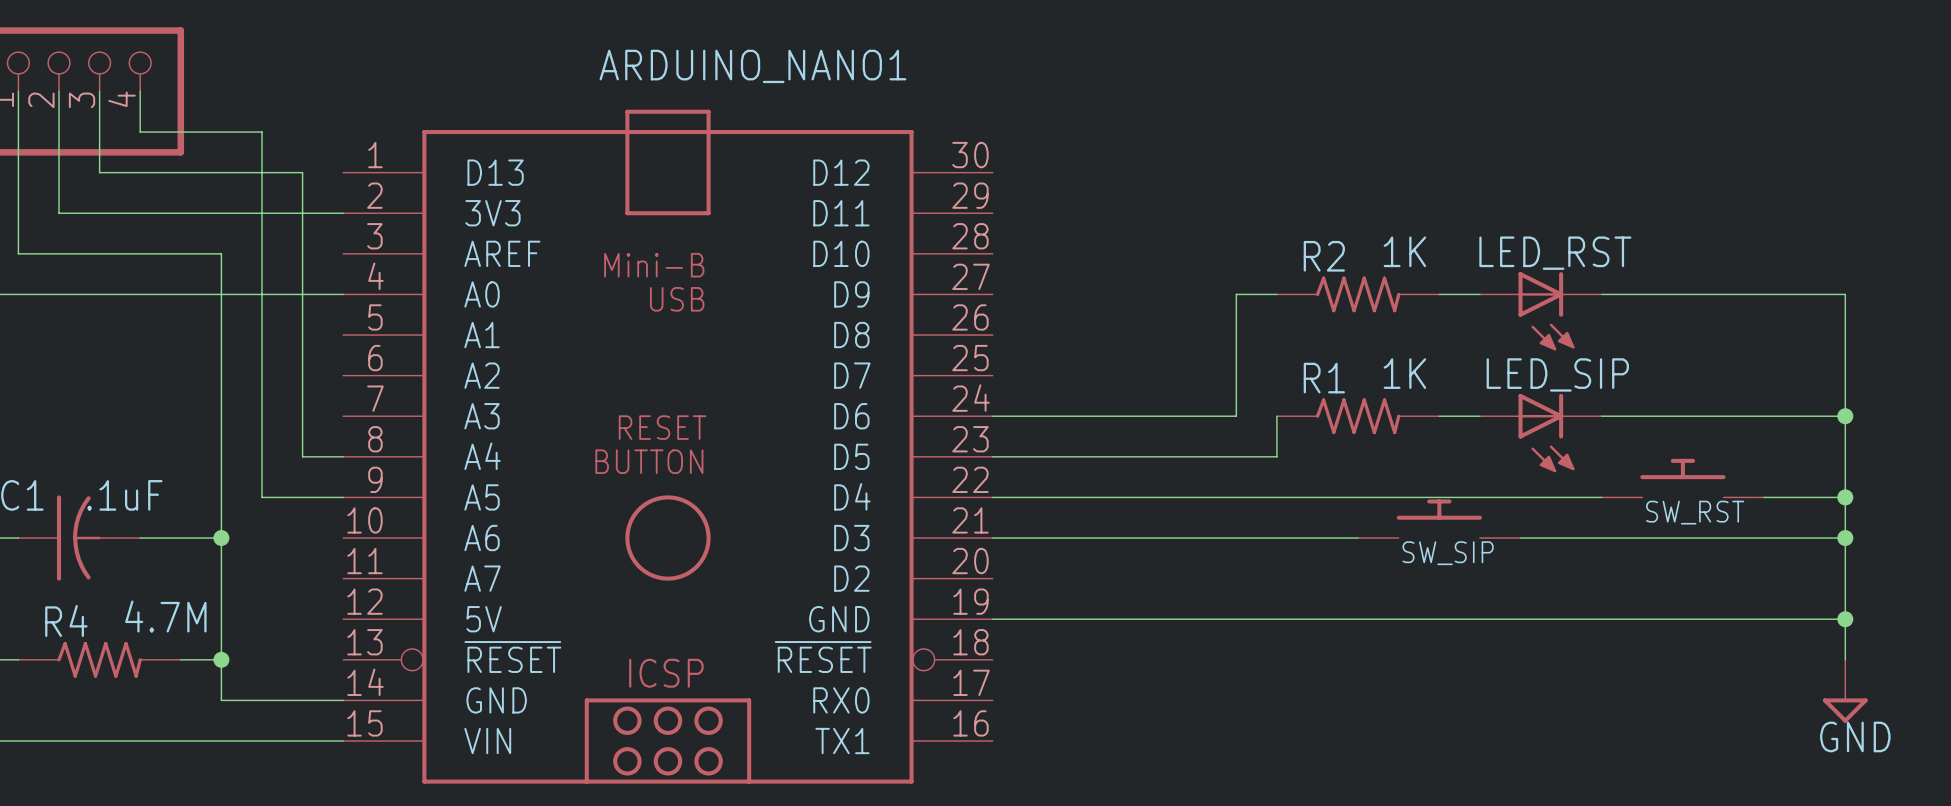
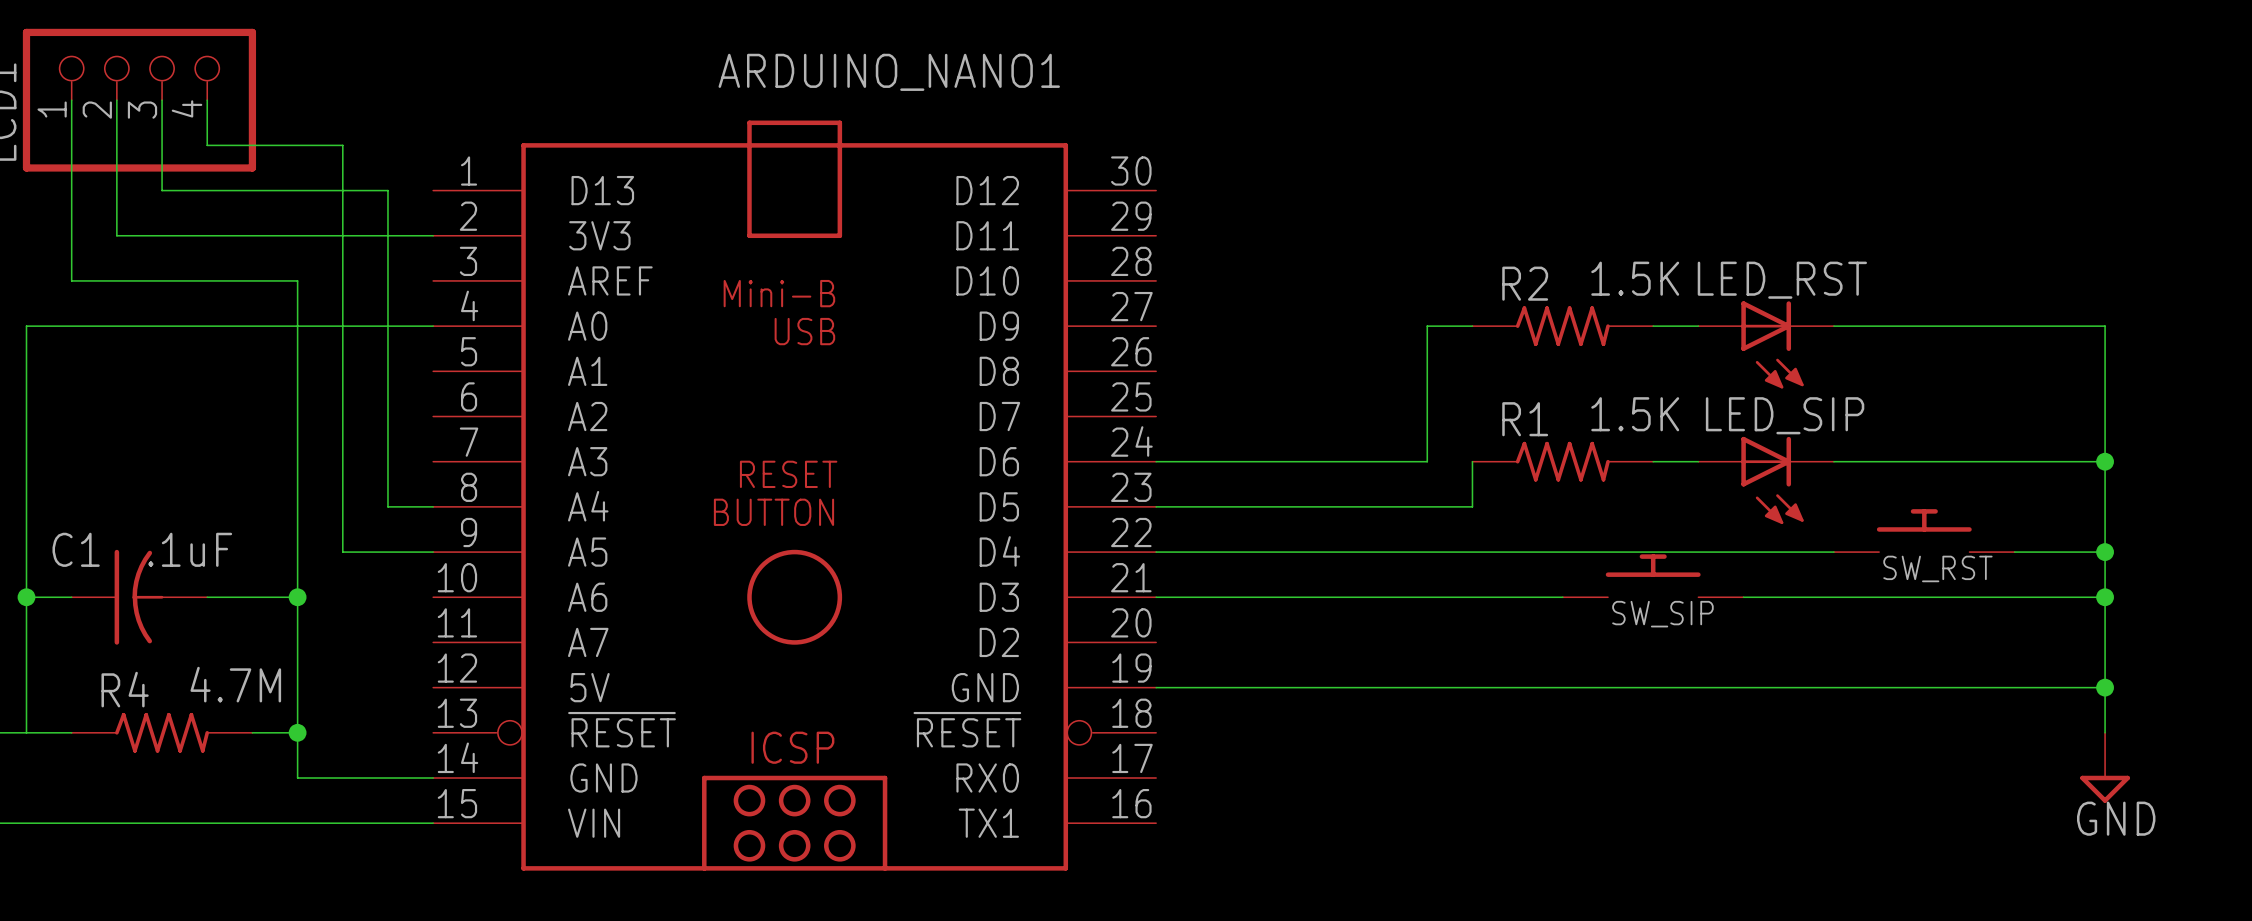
R2 value: 1K (1404, 251) -> 1.5K (1635, 278)
R1 value: 1K (1404, 373) -> 1.5K (1635, 414)

